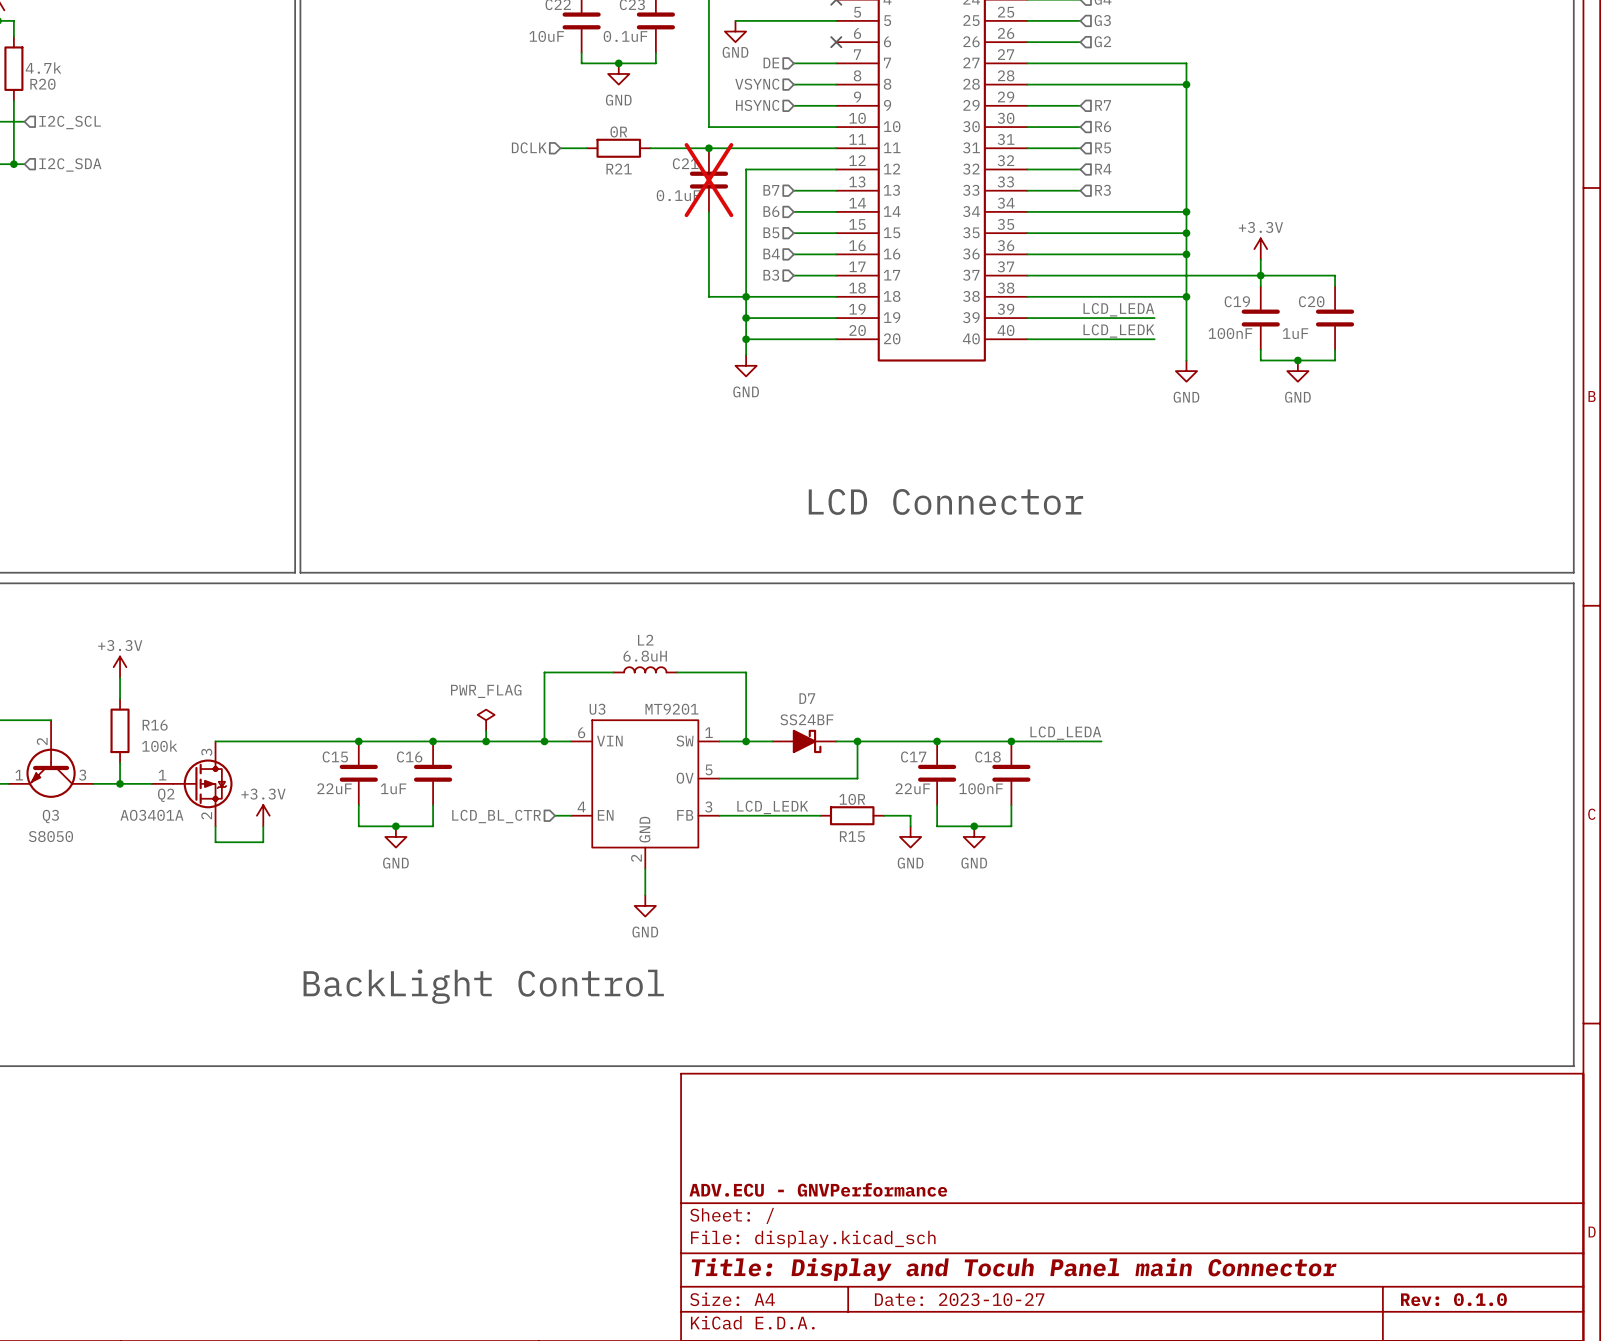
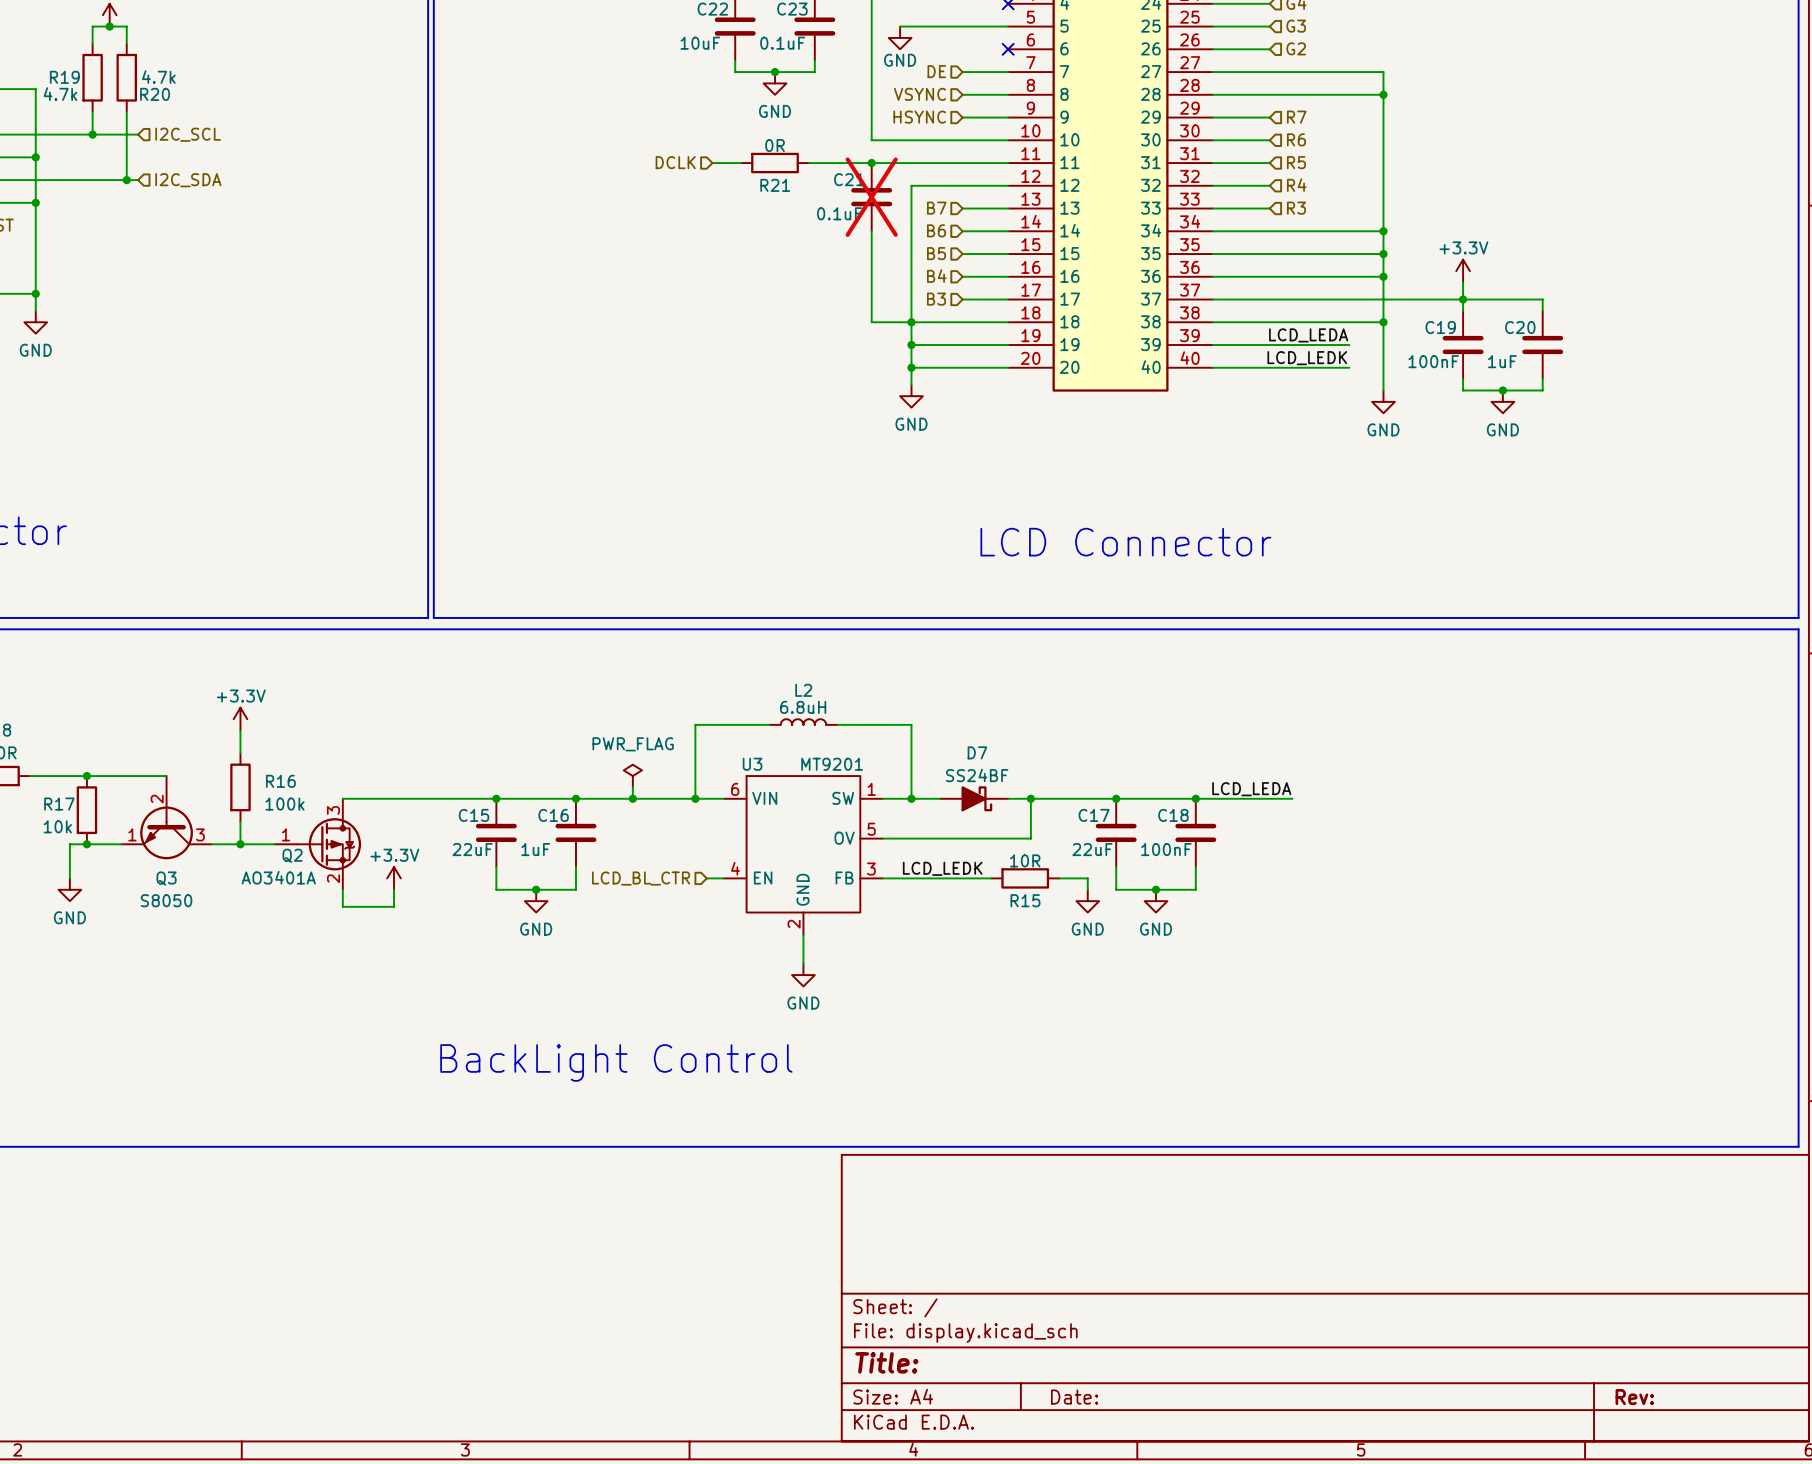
title block: ADV.ECU - GNVPerformance (818, 1189) -> none
title block: Title: Display and Tocuh Panel main Connector (1014, 1269) -> Title: (886, 1362)
title block: Date: 2023-10-27 (959, 1299) -> Date: (1074, 1397)
title block: Rev: 0.1.0 (1453, 1299) -> Rev: (1634, 1397)

